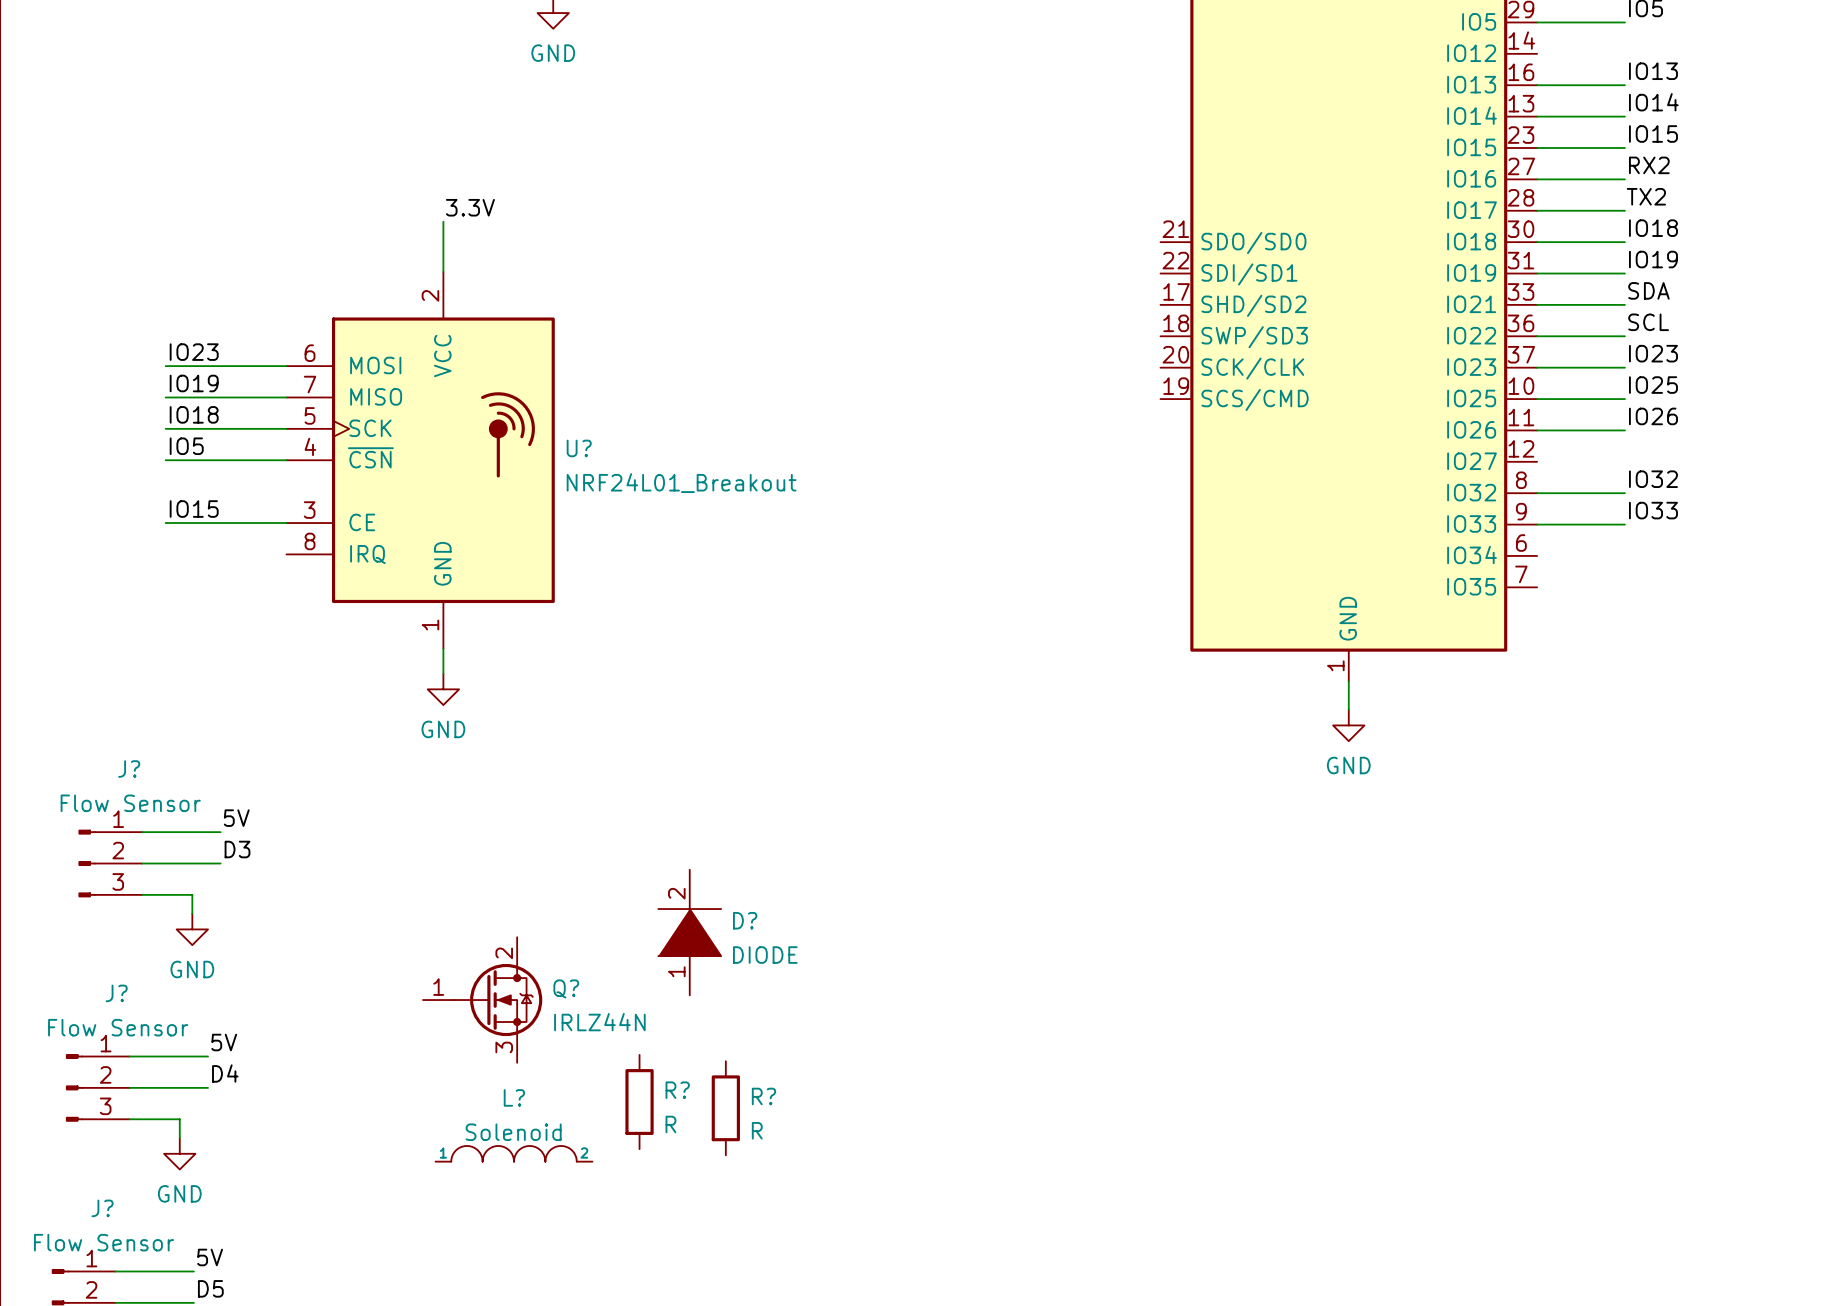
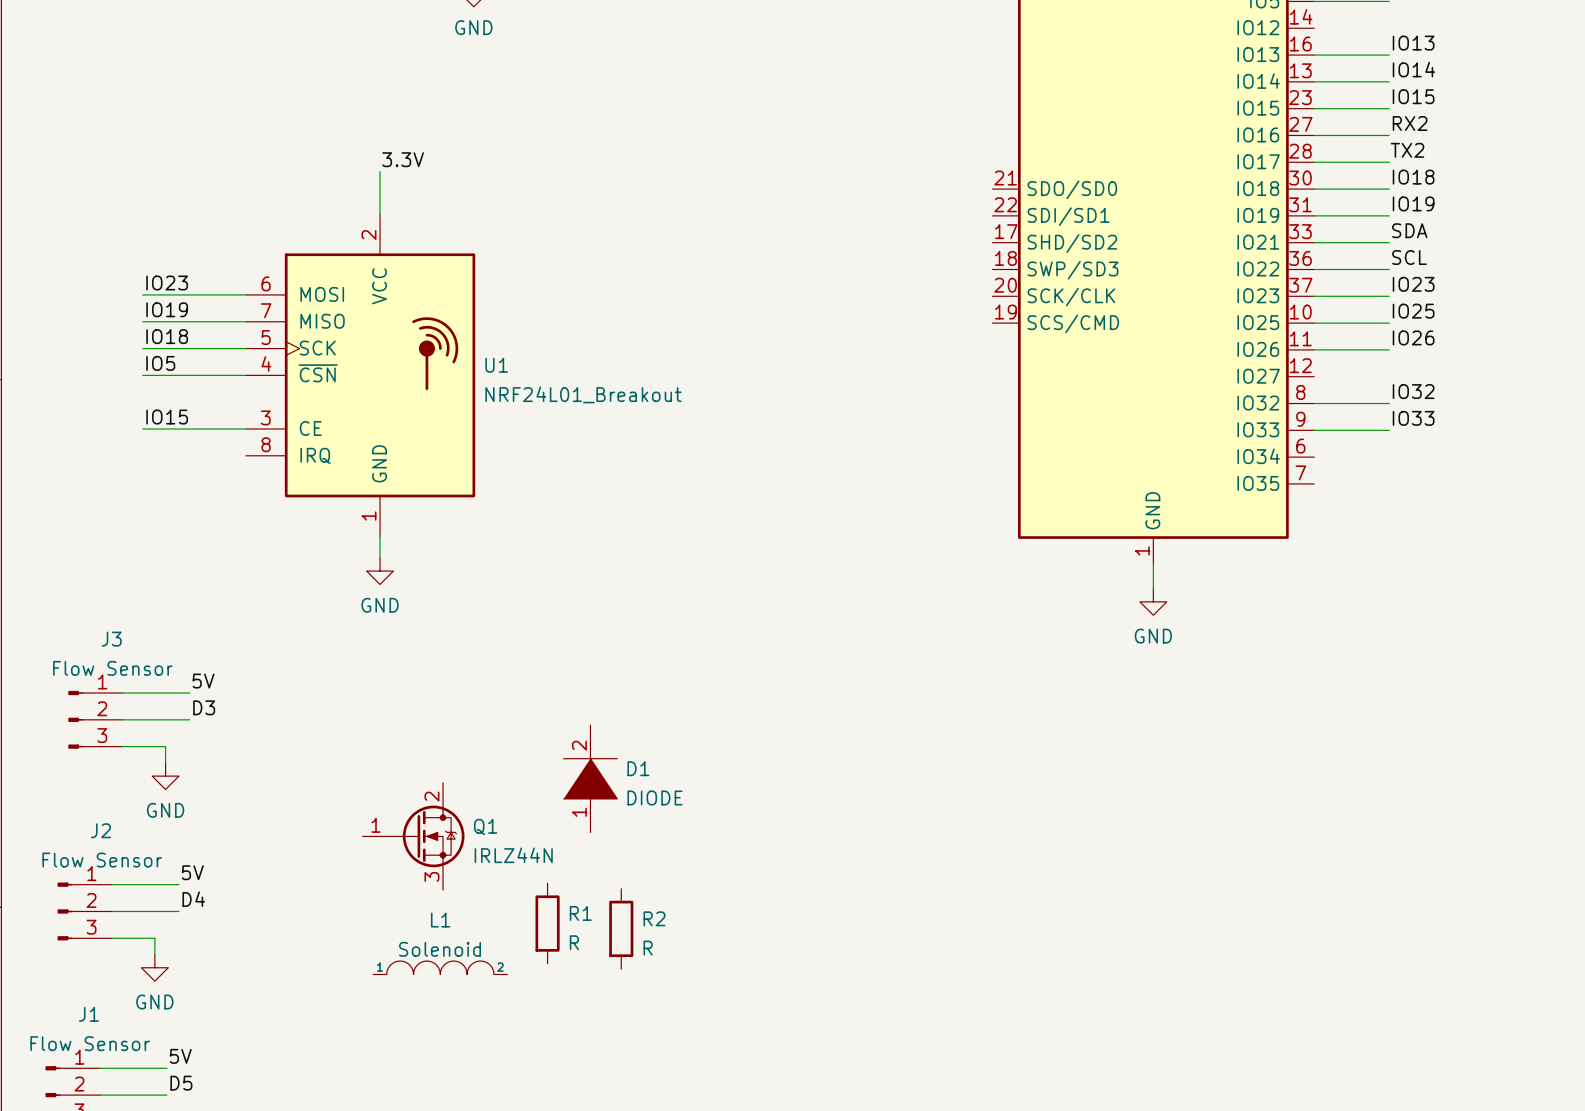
U? name: U? (579, 448) -> U1 (496, 365)
J? name: J? (129, 769) -> J3 (111, 639)
D? name: D? (745, 920) -> D1 (638, 768)
Q? name: Q? (566, 988) -> Q1 (485, 826)
J? name: J? (116, 993) -> J2 (100, 830)
R? name: R? (677, 1090) -> R1 (580, 913)
R? name: R? (763, 1096) -> R2 (654, 918)
L? name: L? (514, 1097) -> L1 (440, 920)
J? name: J? (102, 1208) -> J1 (88, 1014)

